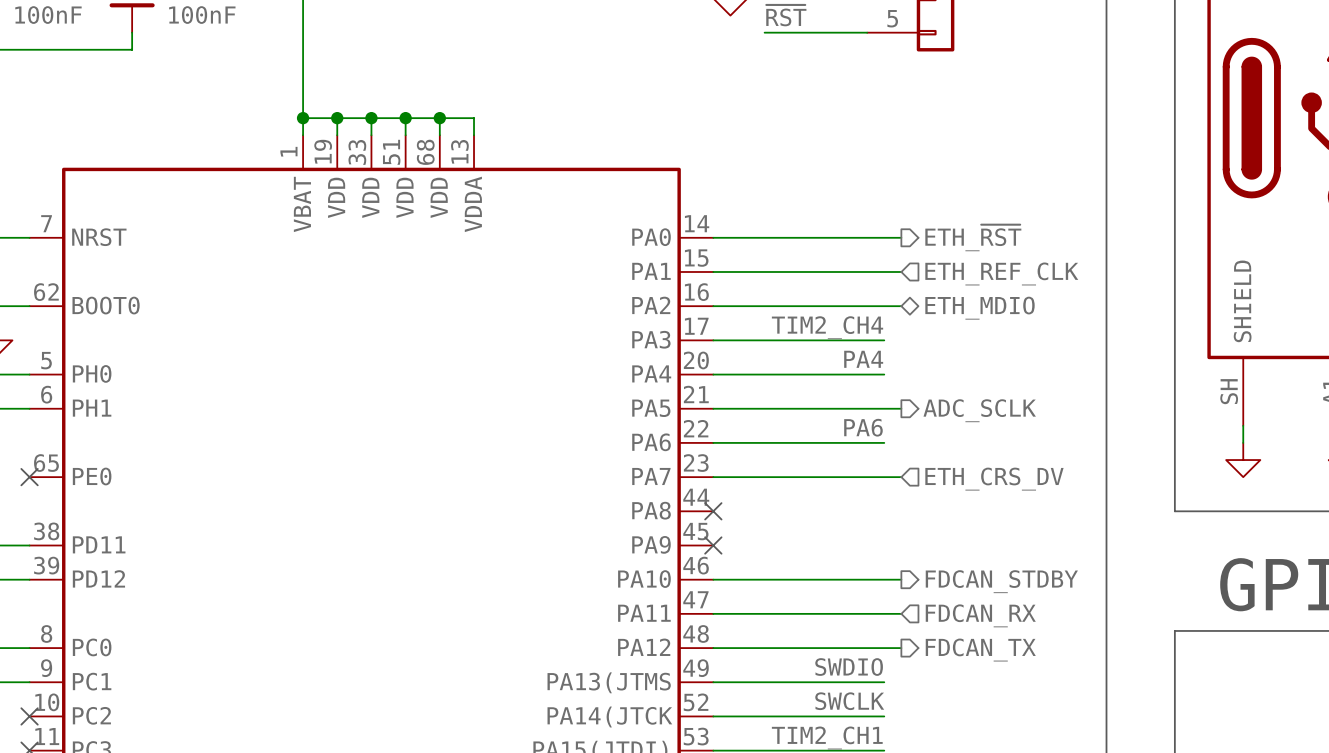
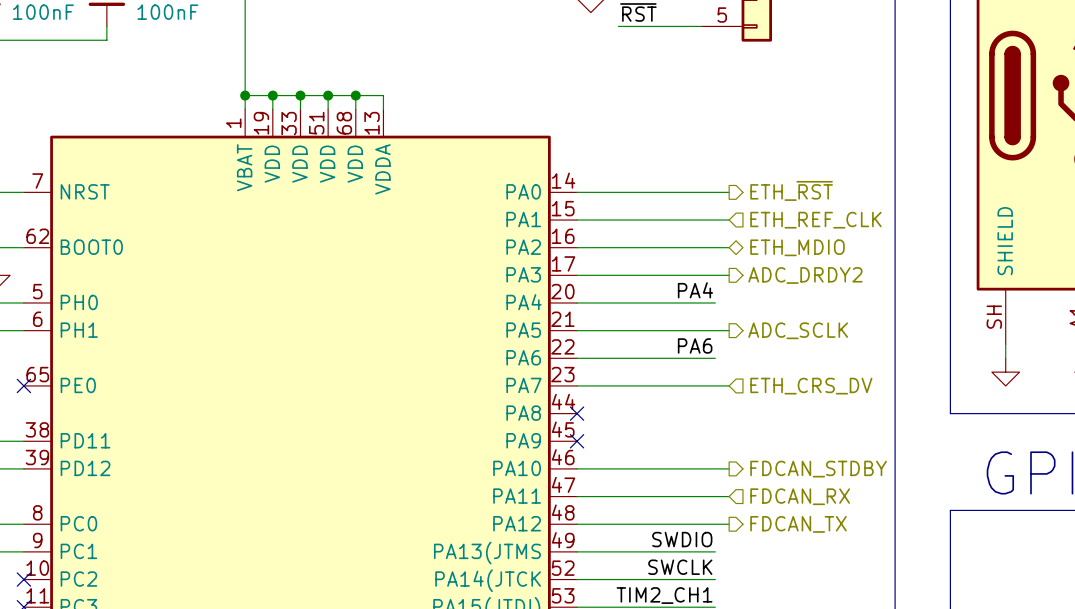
label: TIM2_CH4 (827, 327) -> none
wire: none -> (715, 275) (729, 275)
hierarchical label: none -> ADC_DRDY2 (805, 275)

